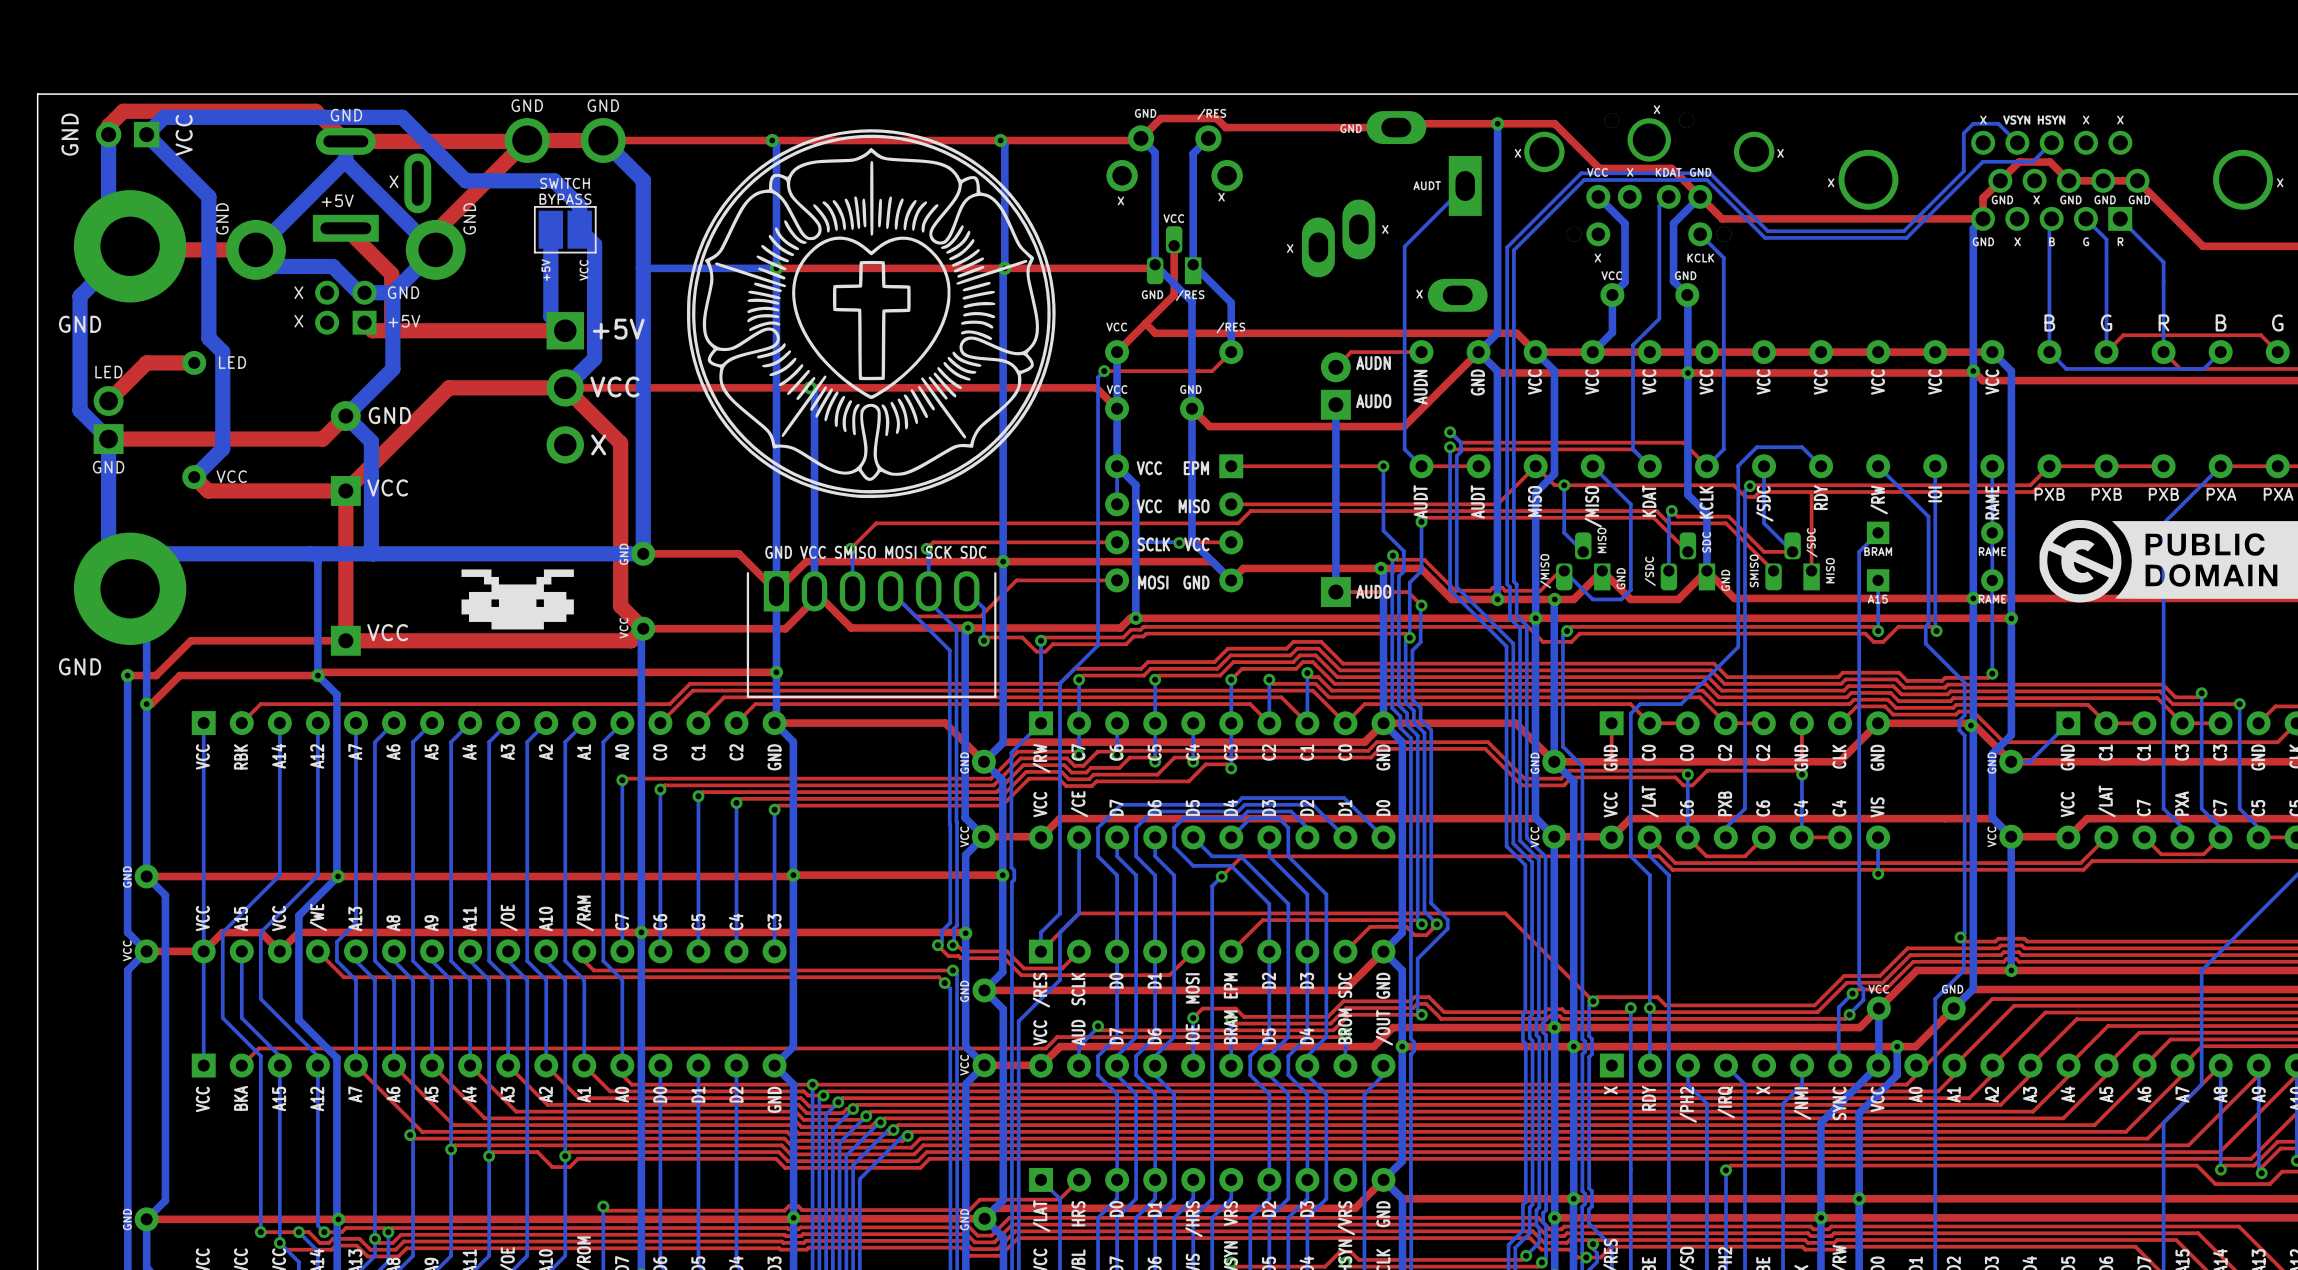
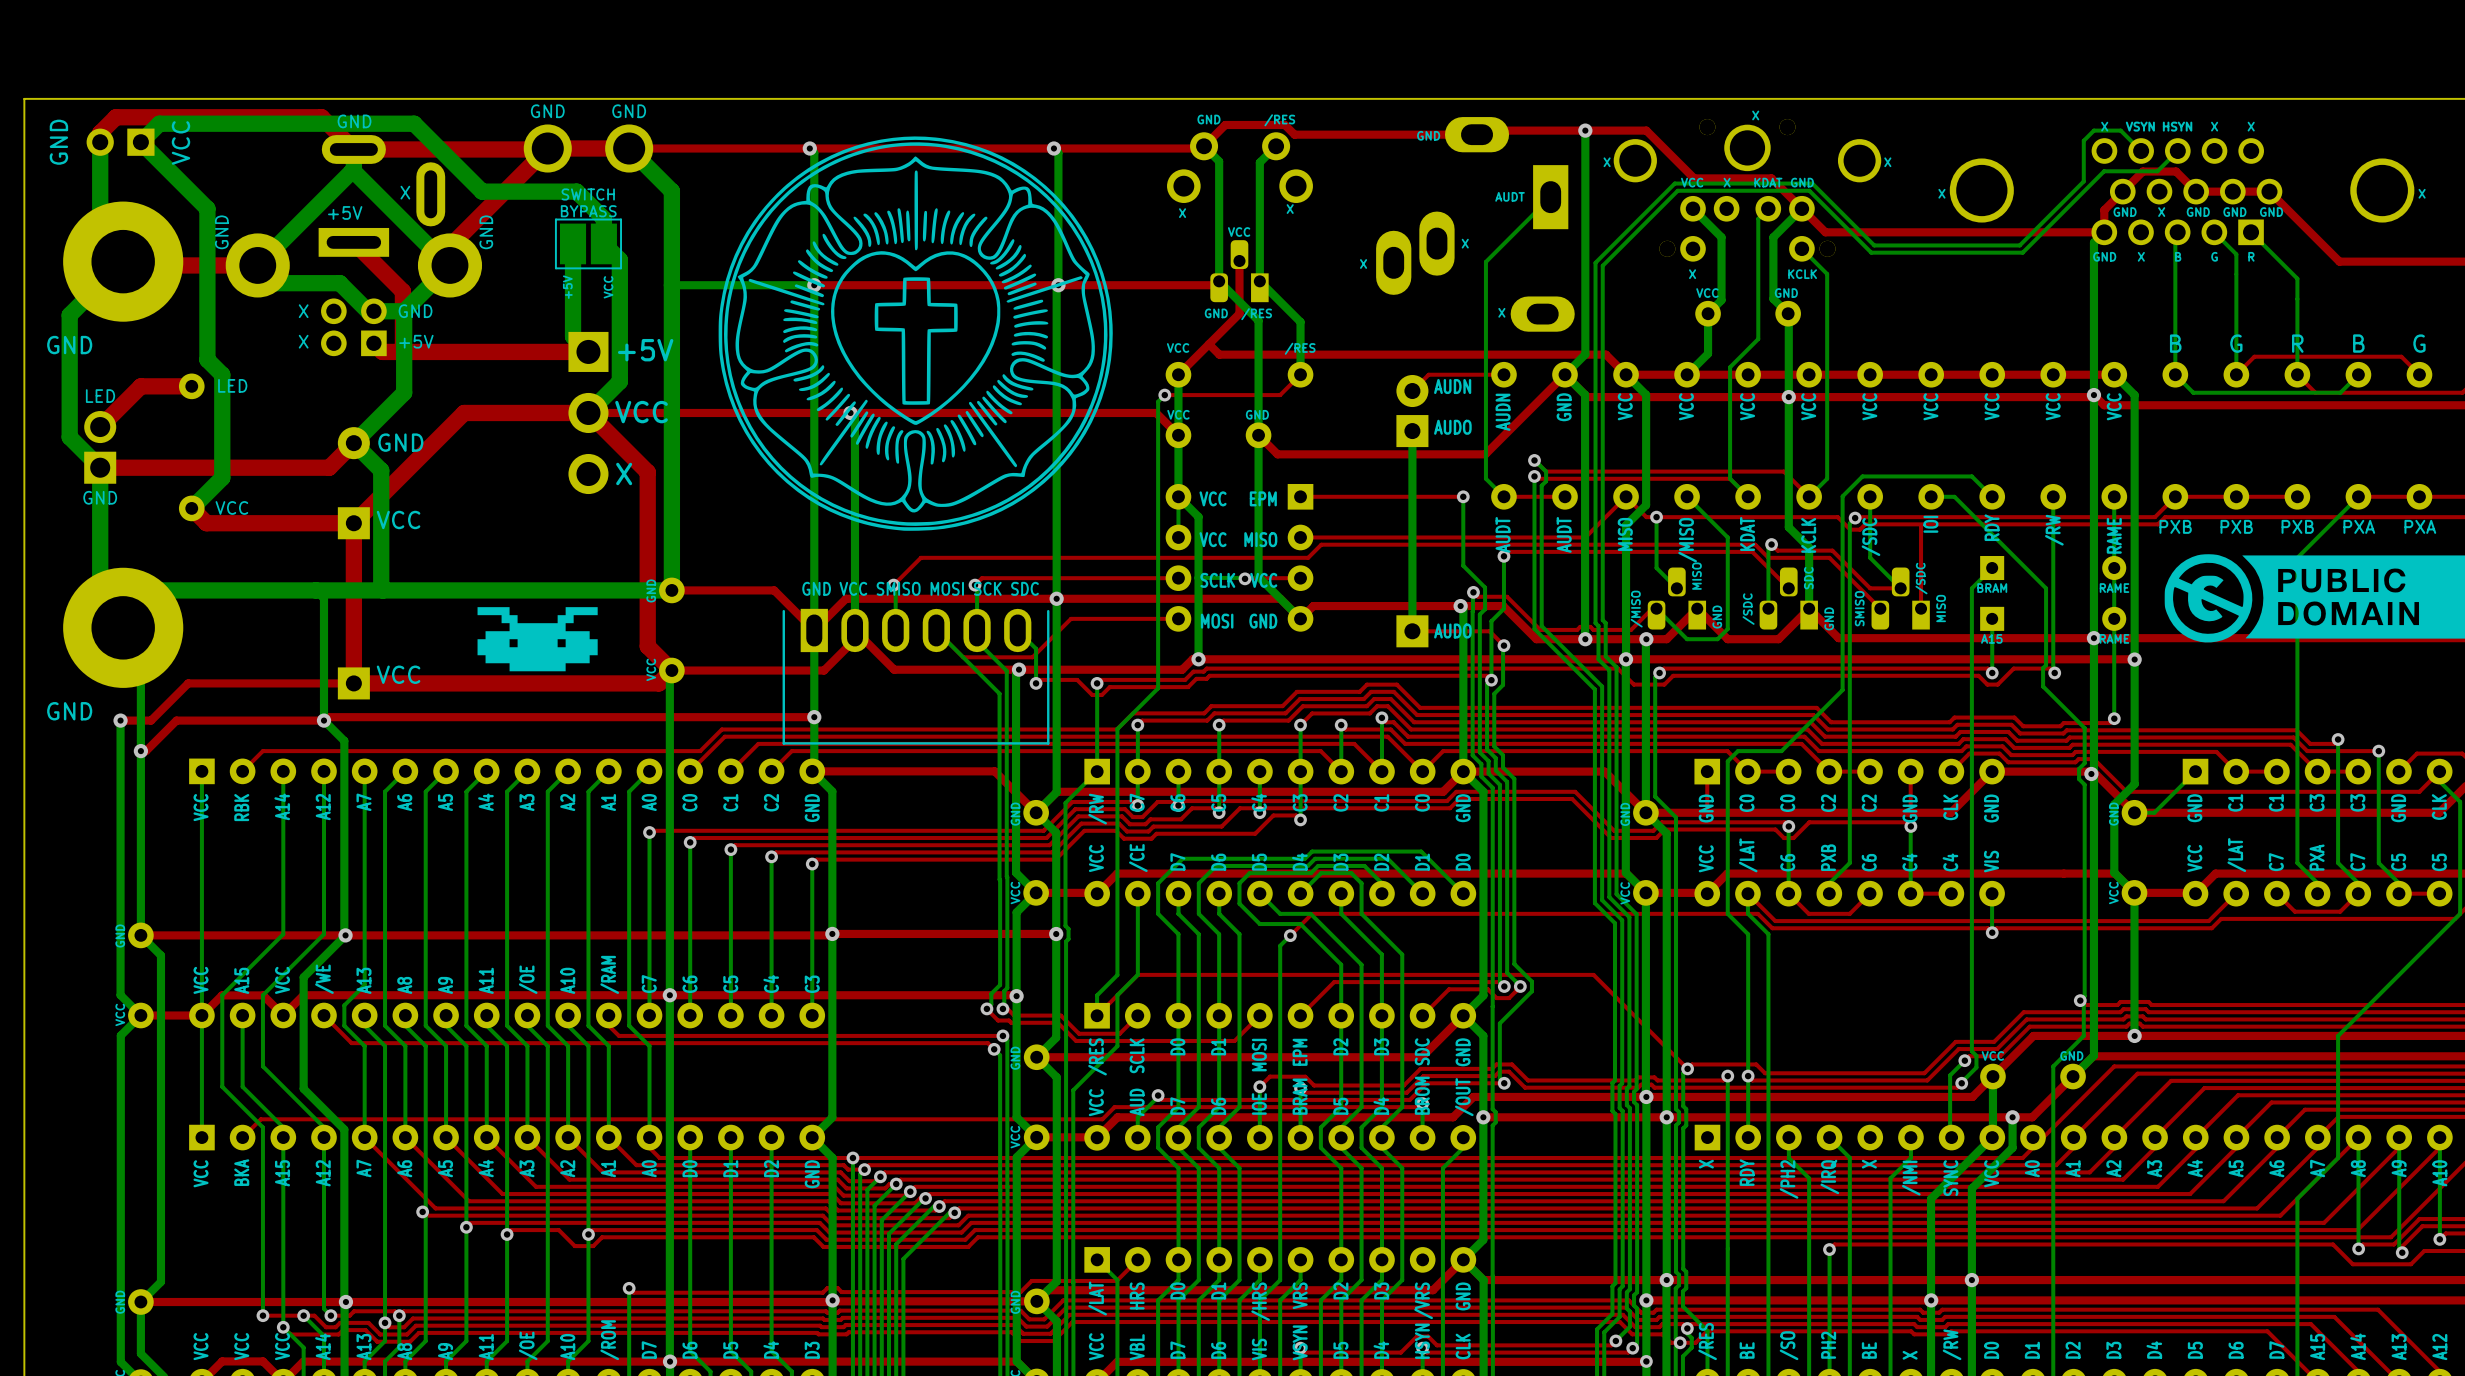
bottom track: (1802, 447) (1821, 466) -> (1910, 476) (1971, 476) (1992, 496)
bottom track: (1878, 466) (1928, 516) (1928, 551) -> (1931, 496) (1954, 496) (2046, 588)
text: IOI (1935, 494) -> /RW (2054, 530)
text: RDY (1820, 497) -> IOI (1930, 524)
text: /RW (1879, 499) -> RDY (1992, 527)

